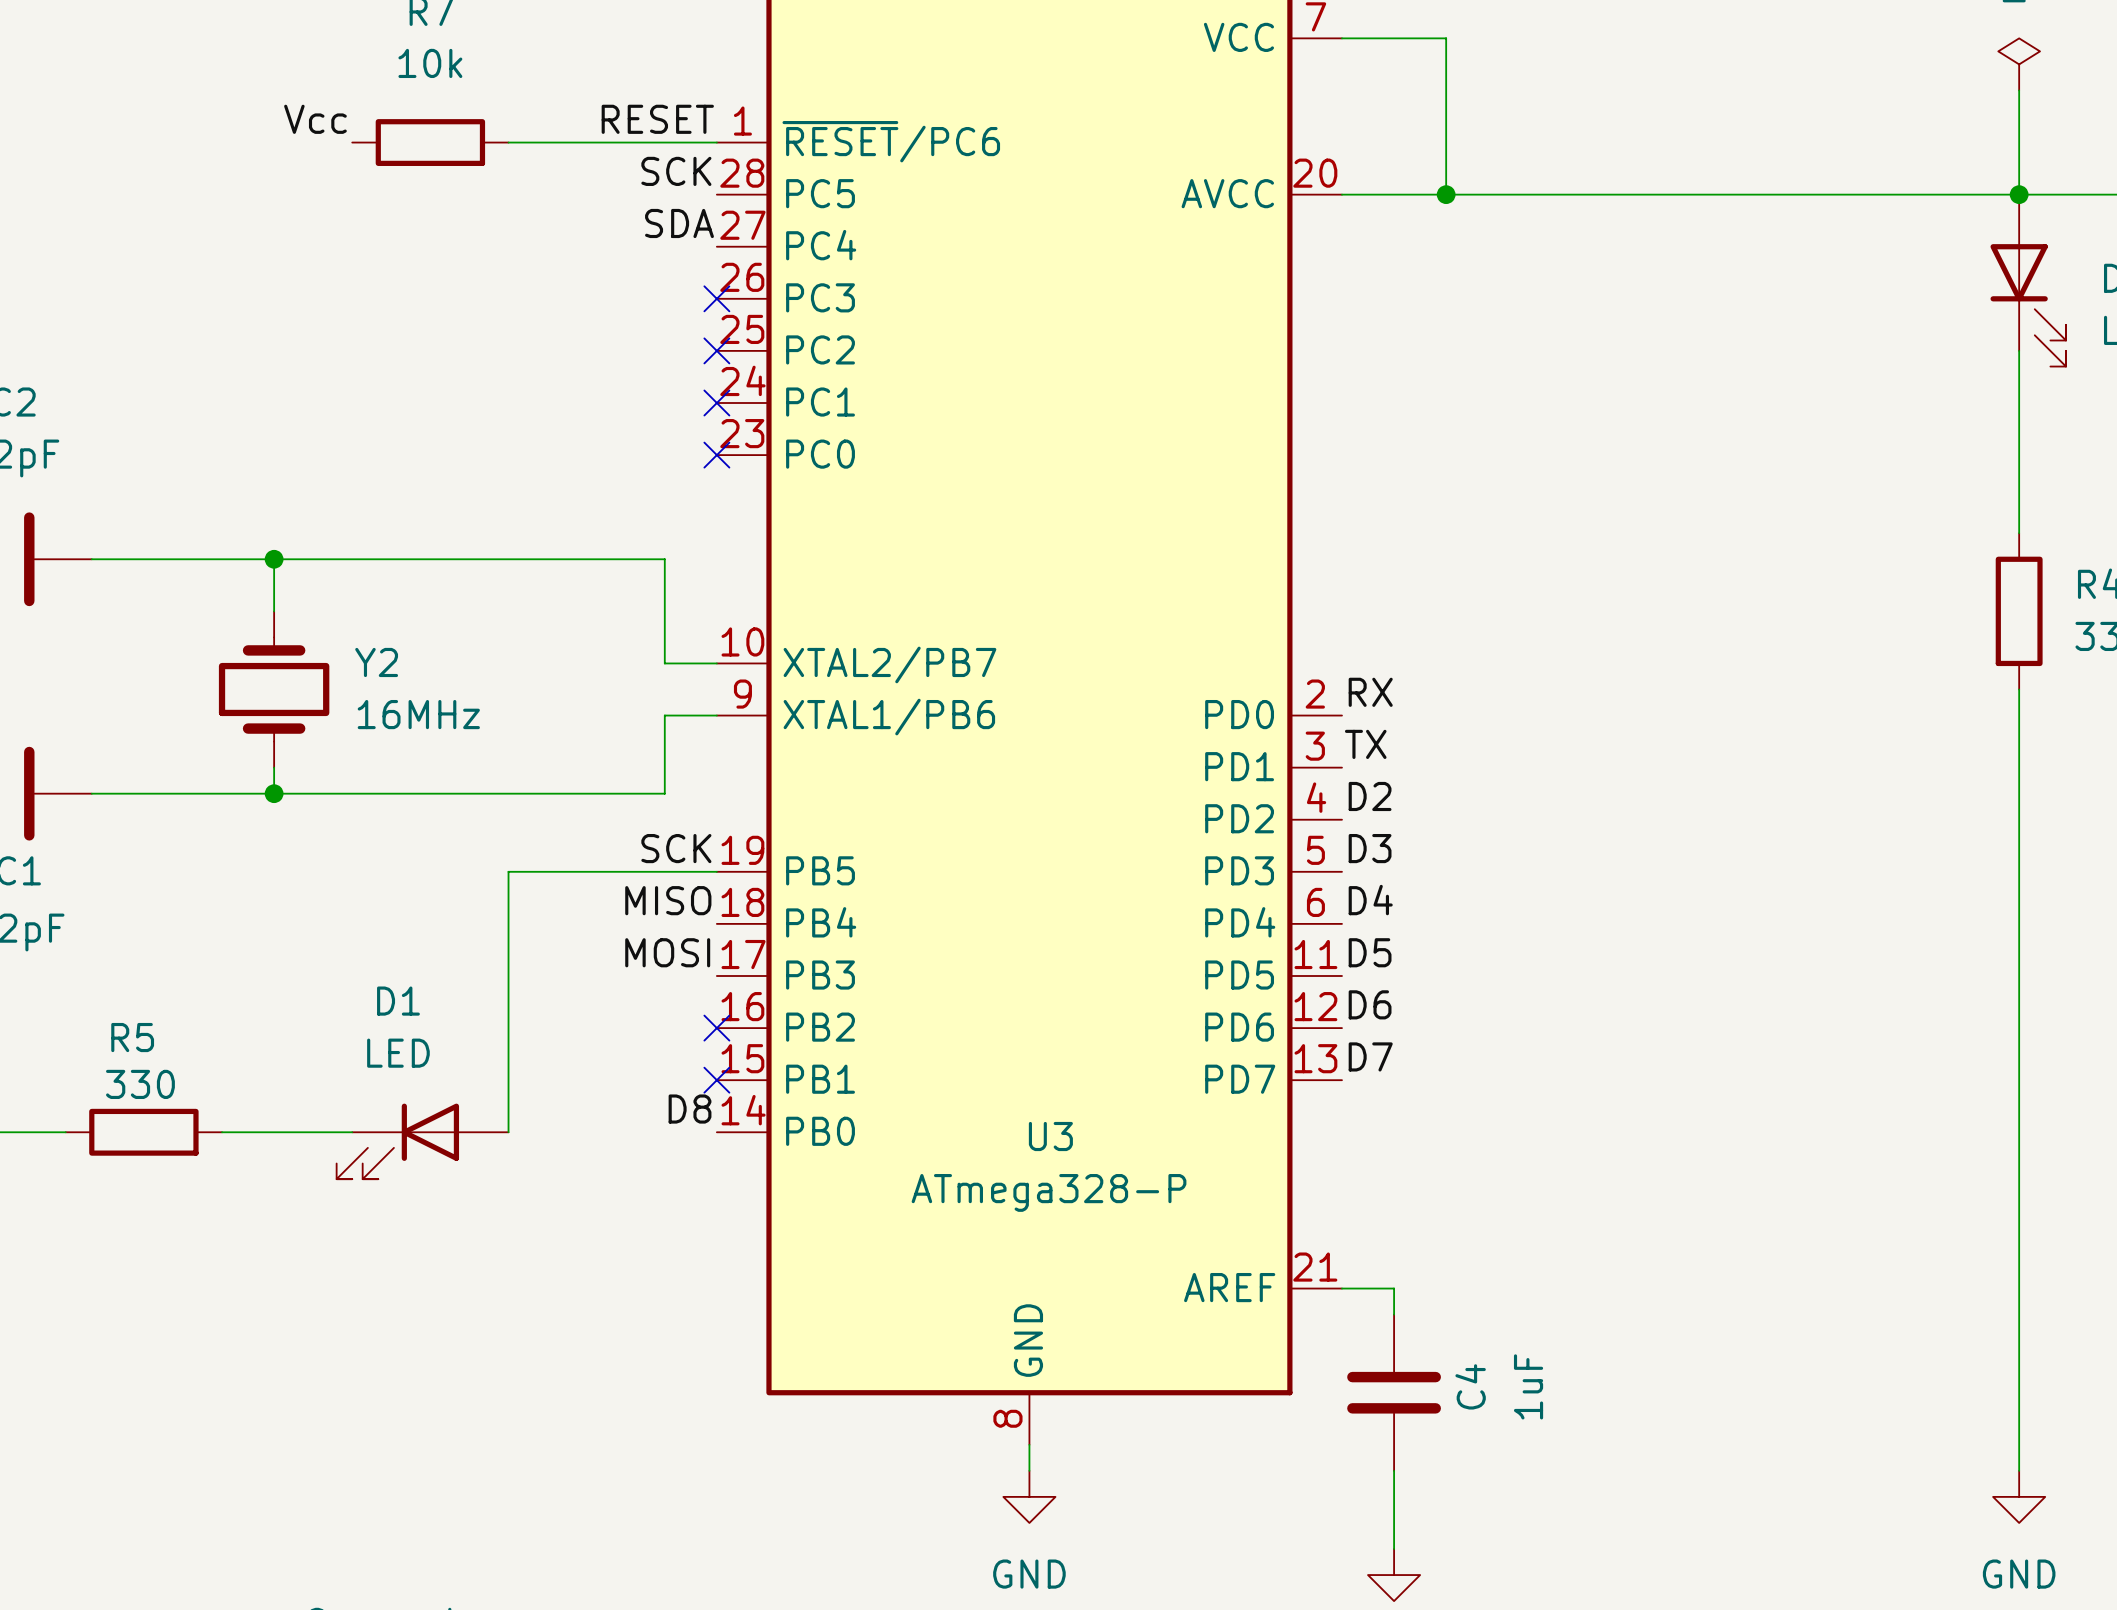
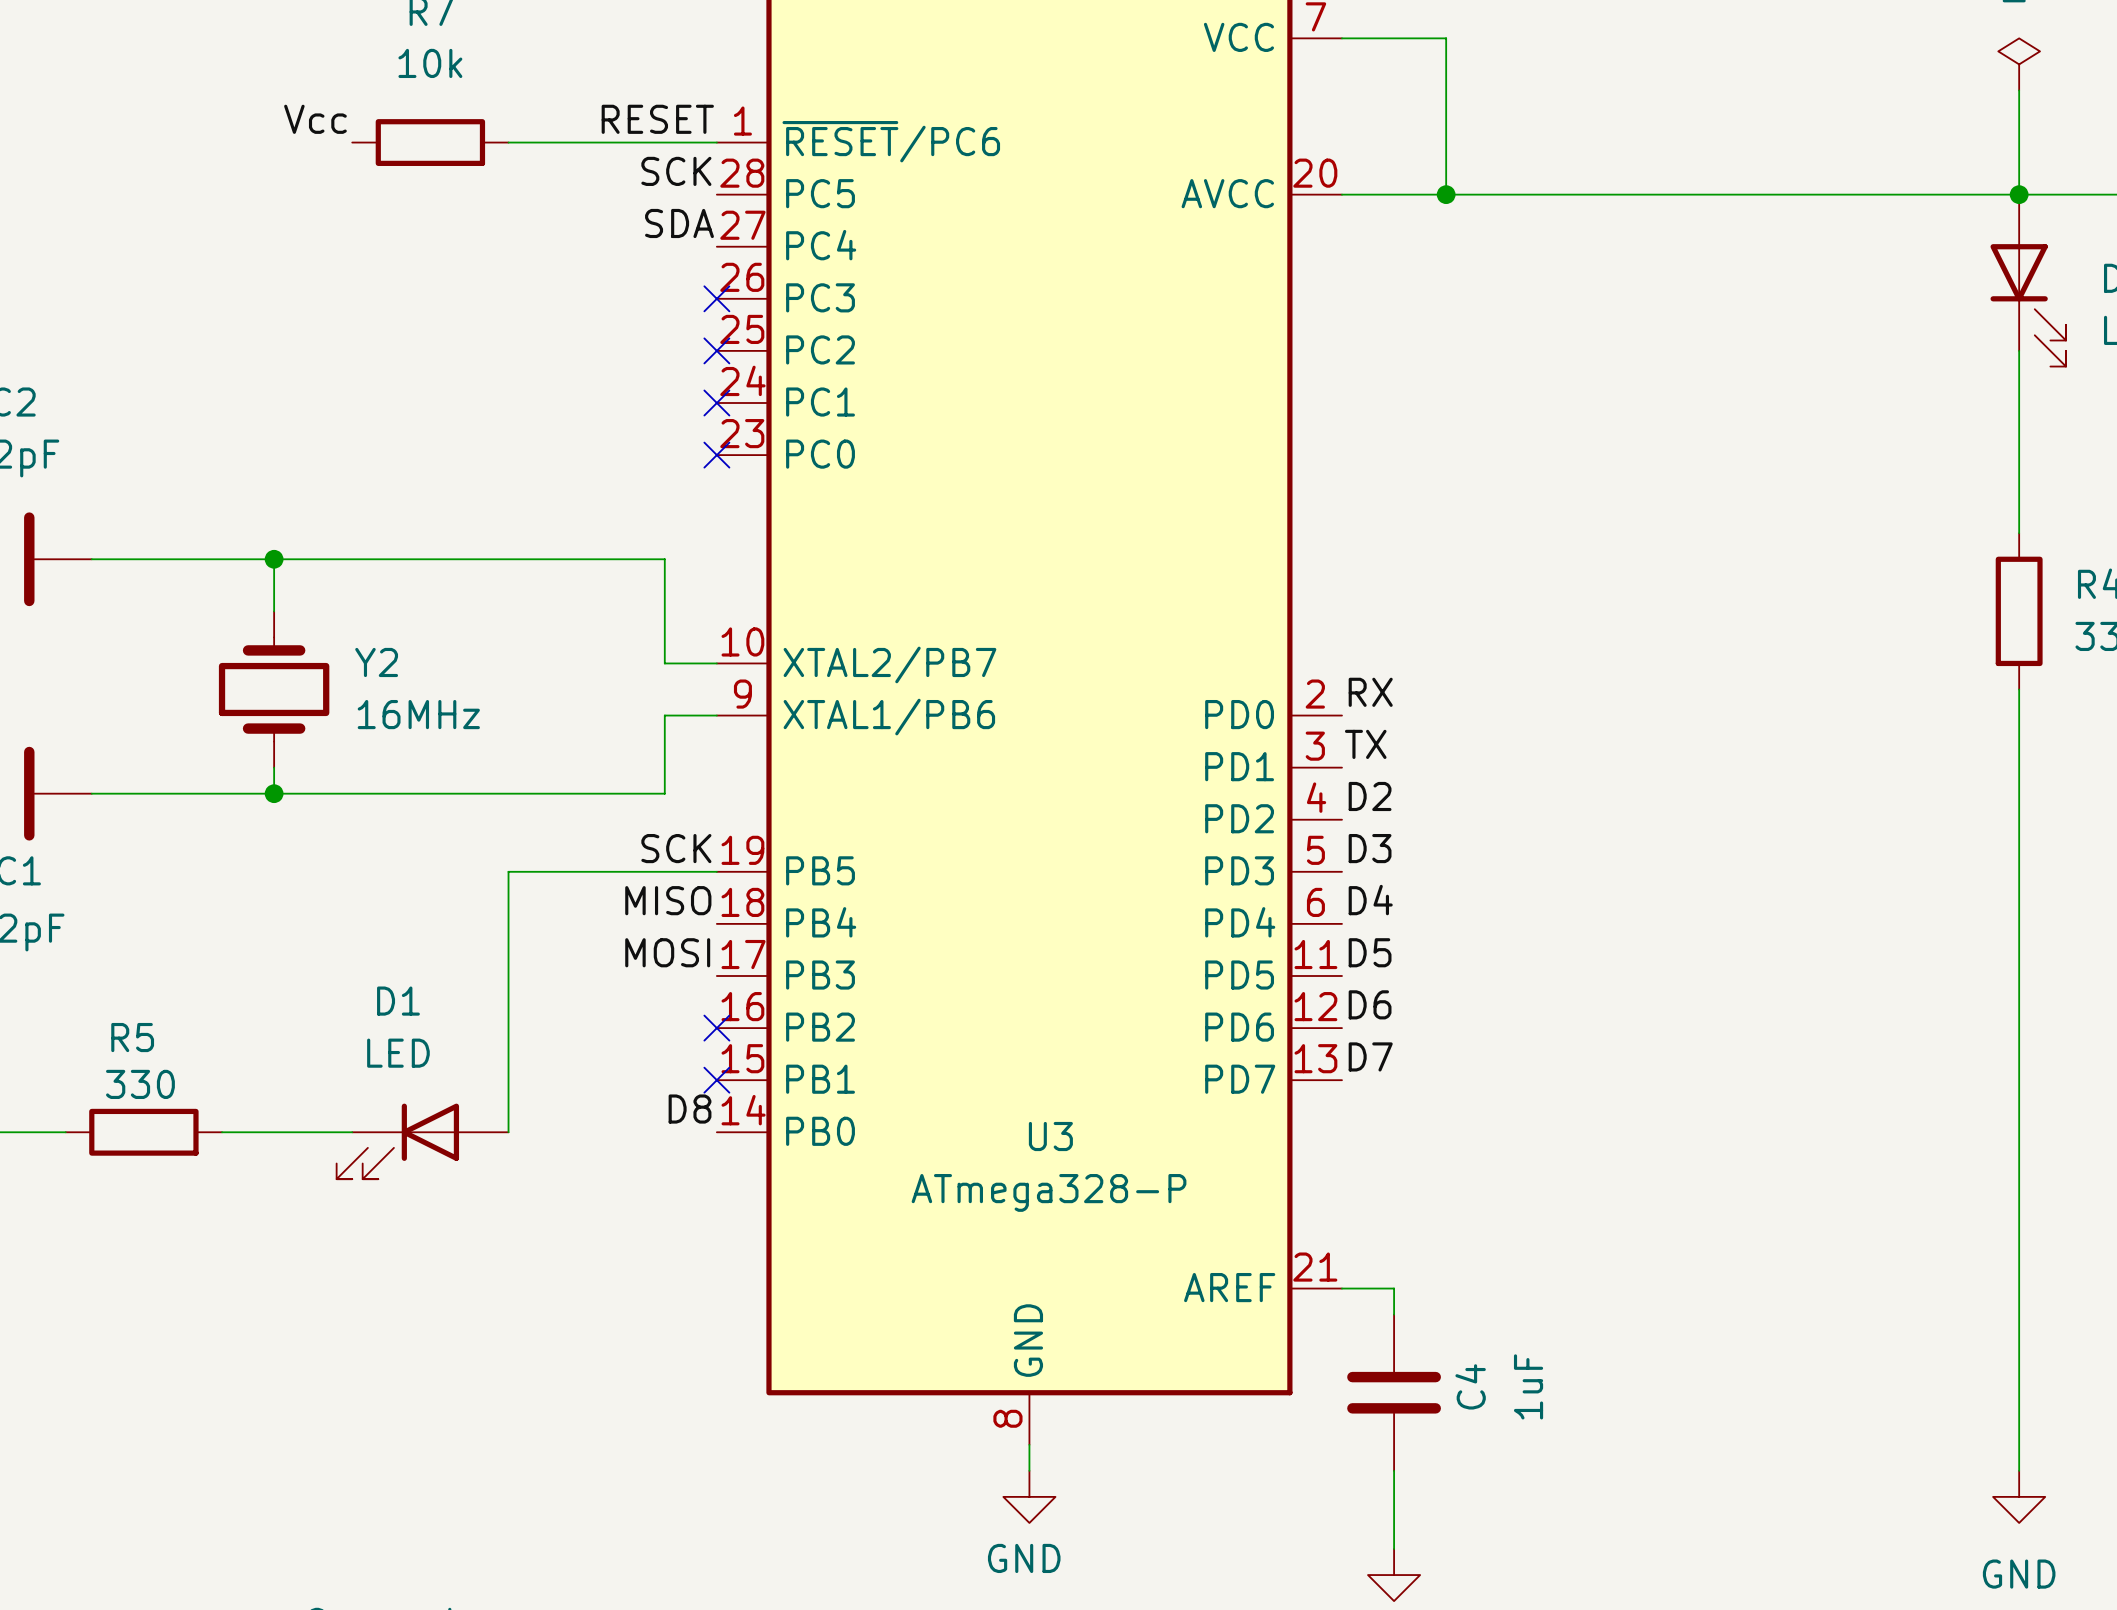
power symbol text position: GND (1029, 1574) -> GND (1024, 1558)

